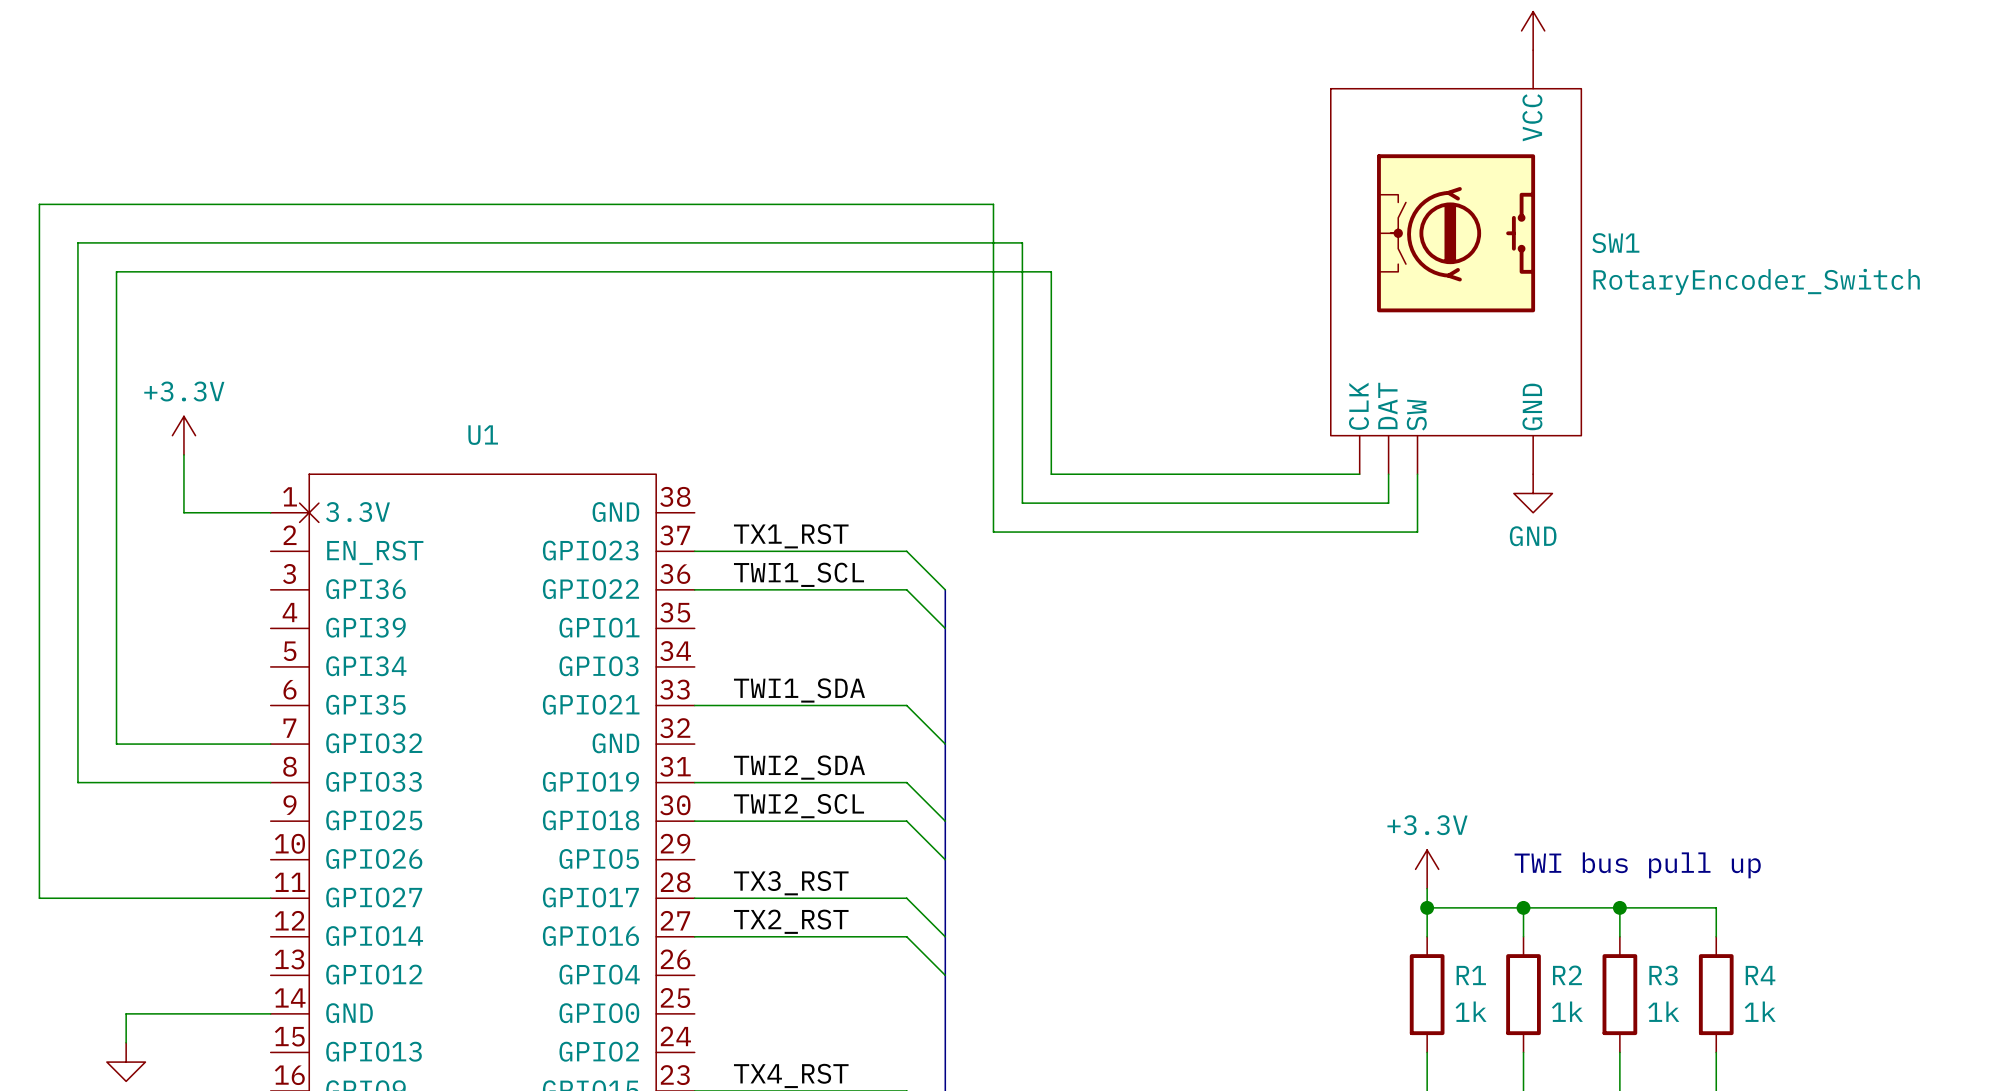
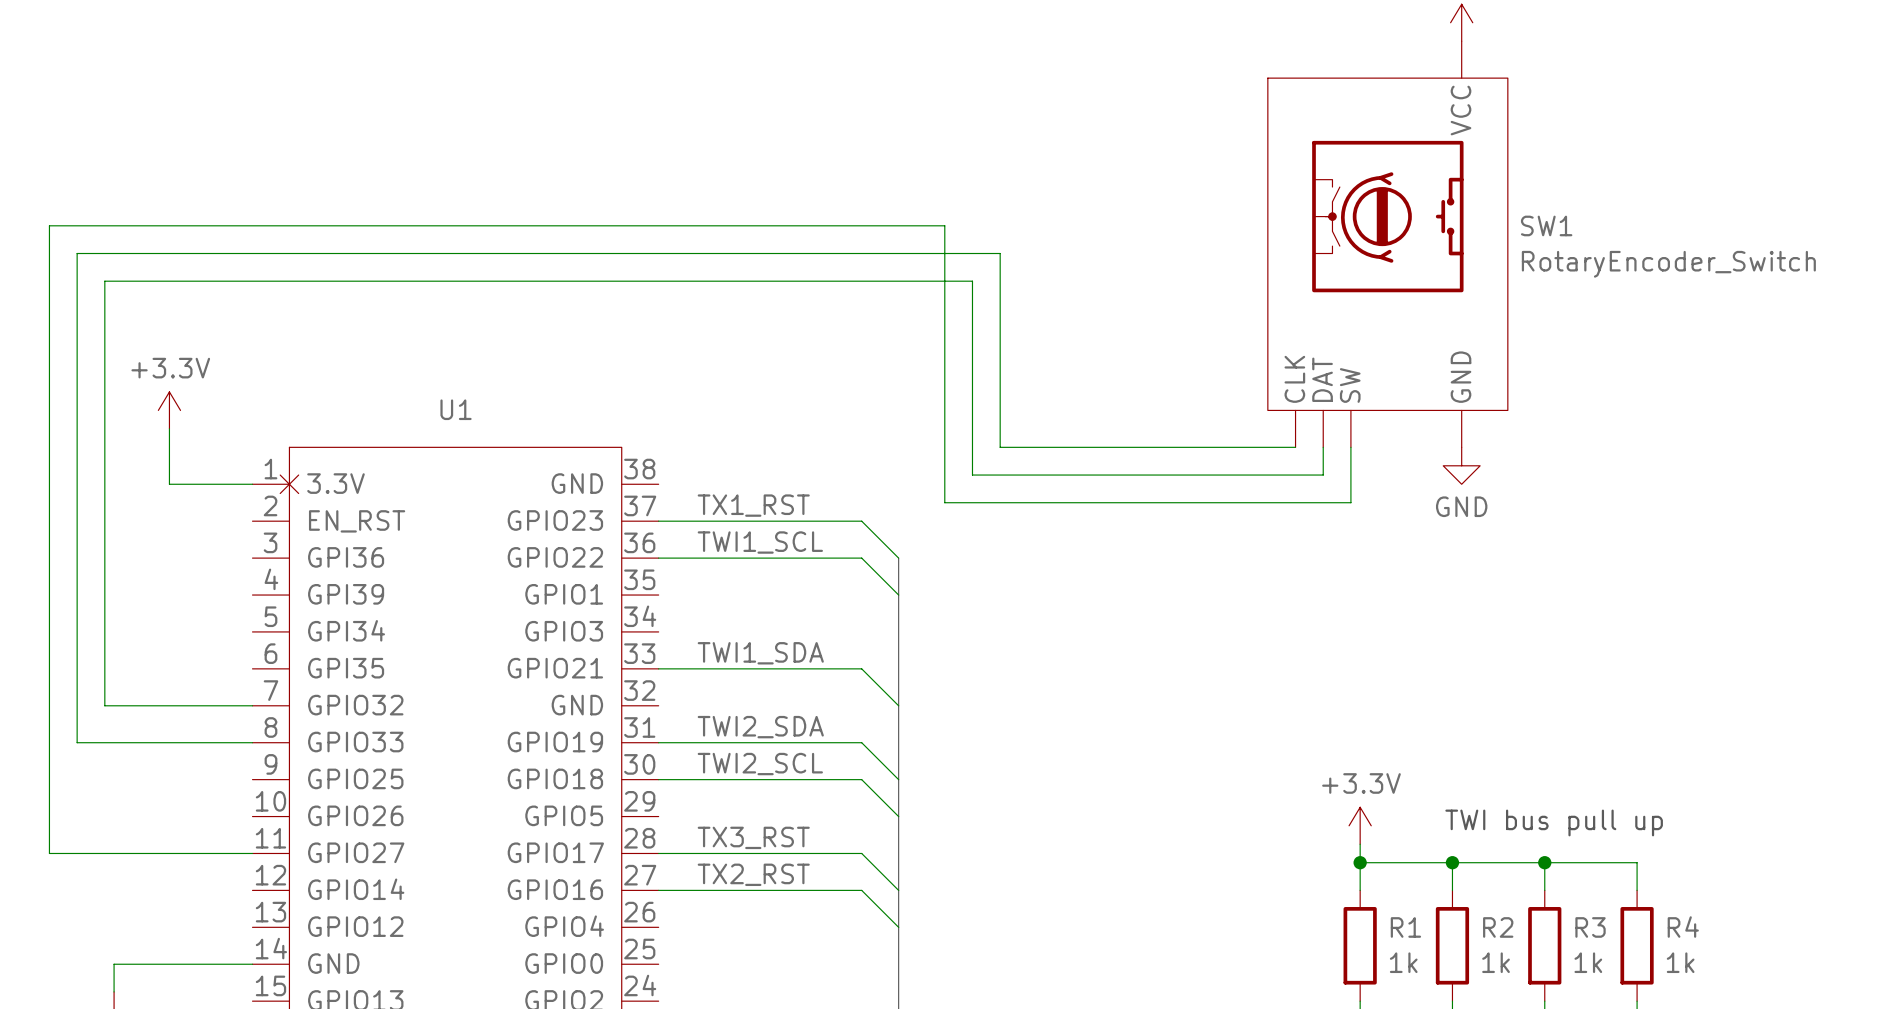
wire: (77, 242) (77, 782) (87, 782) -> (104, 253) (77, 253) (77, 742)
wire: none -> (67, 225) (49, 225) (49, 853)
wire: (116, 271) (116, 300) -> none
wire: (1022, 300) (1022, 242) (993, 242) (993, 204) (39, 204) (39, 898) (58, 898) -> (972, 281) (104, 281)

